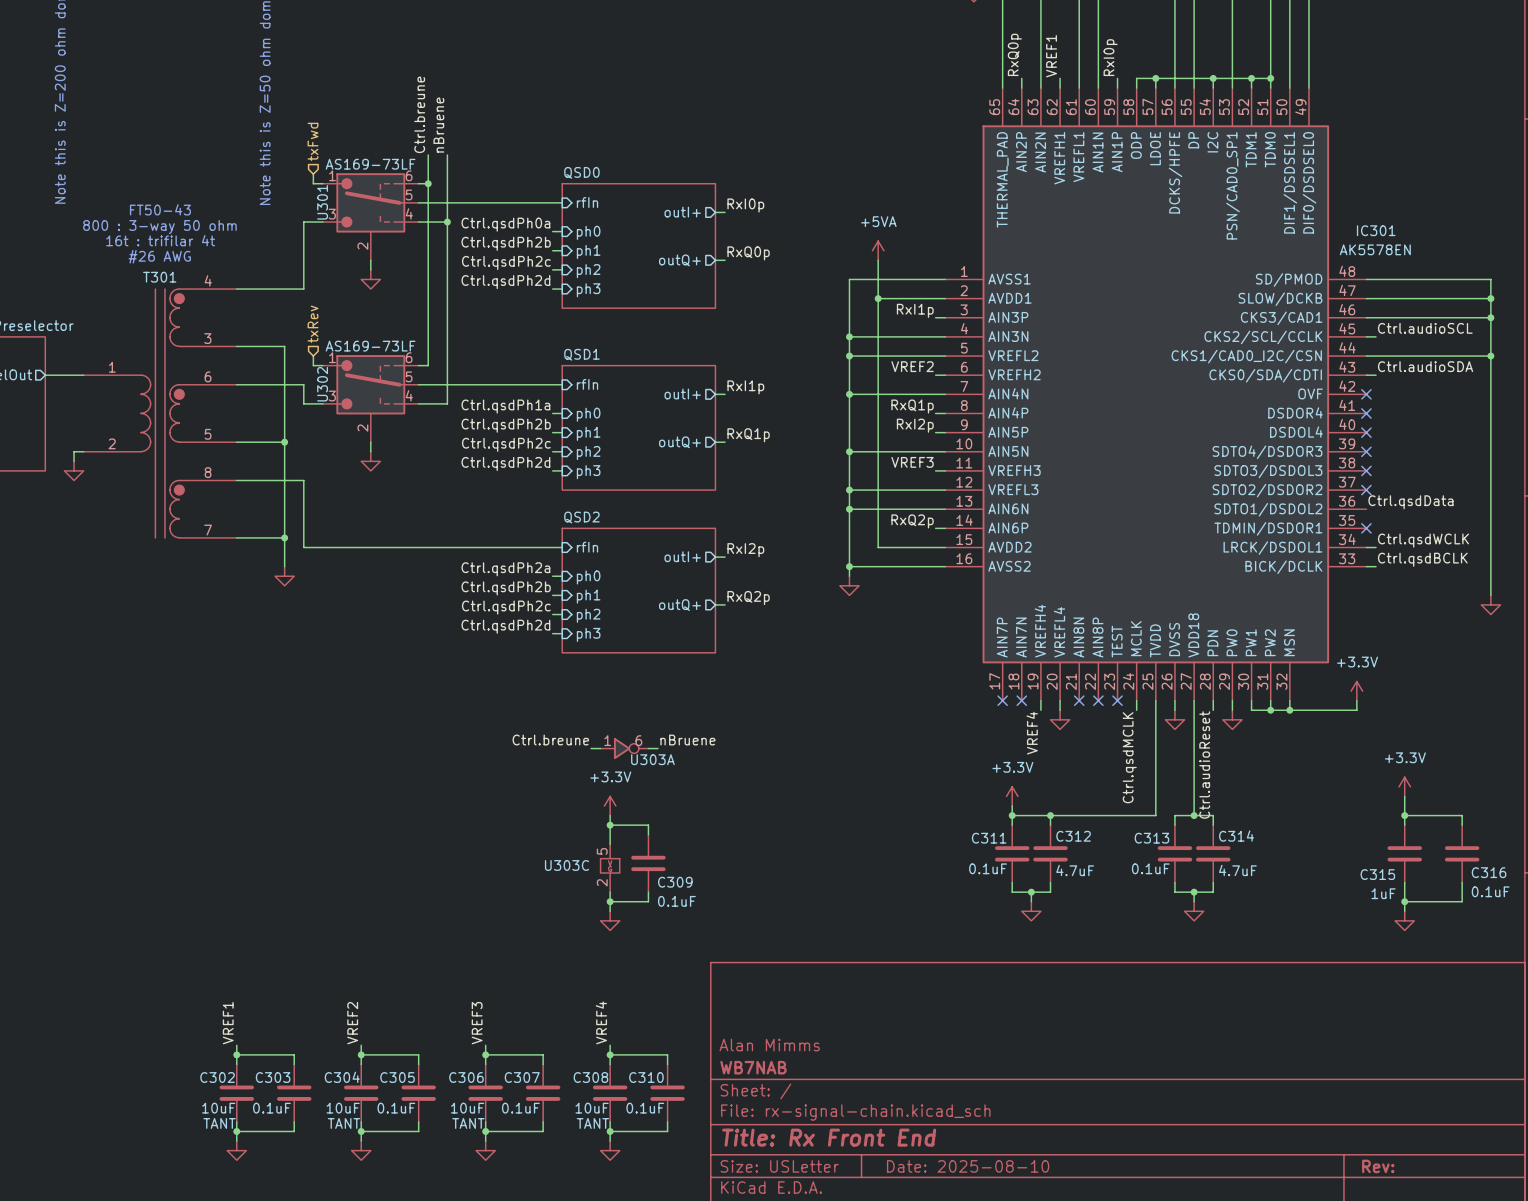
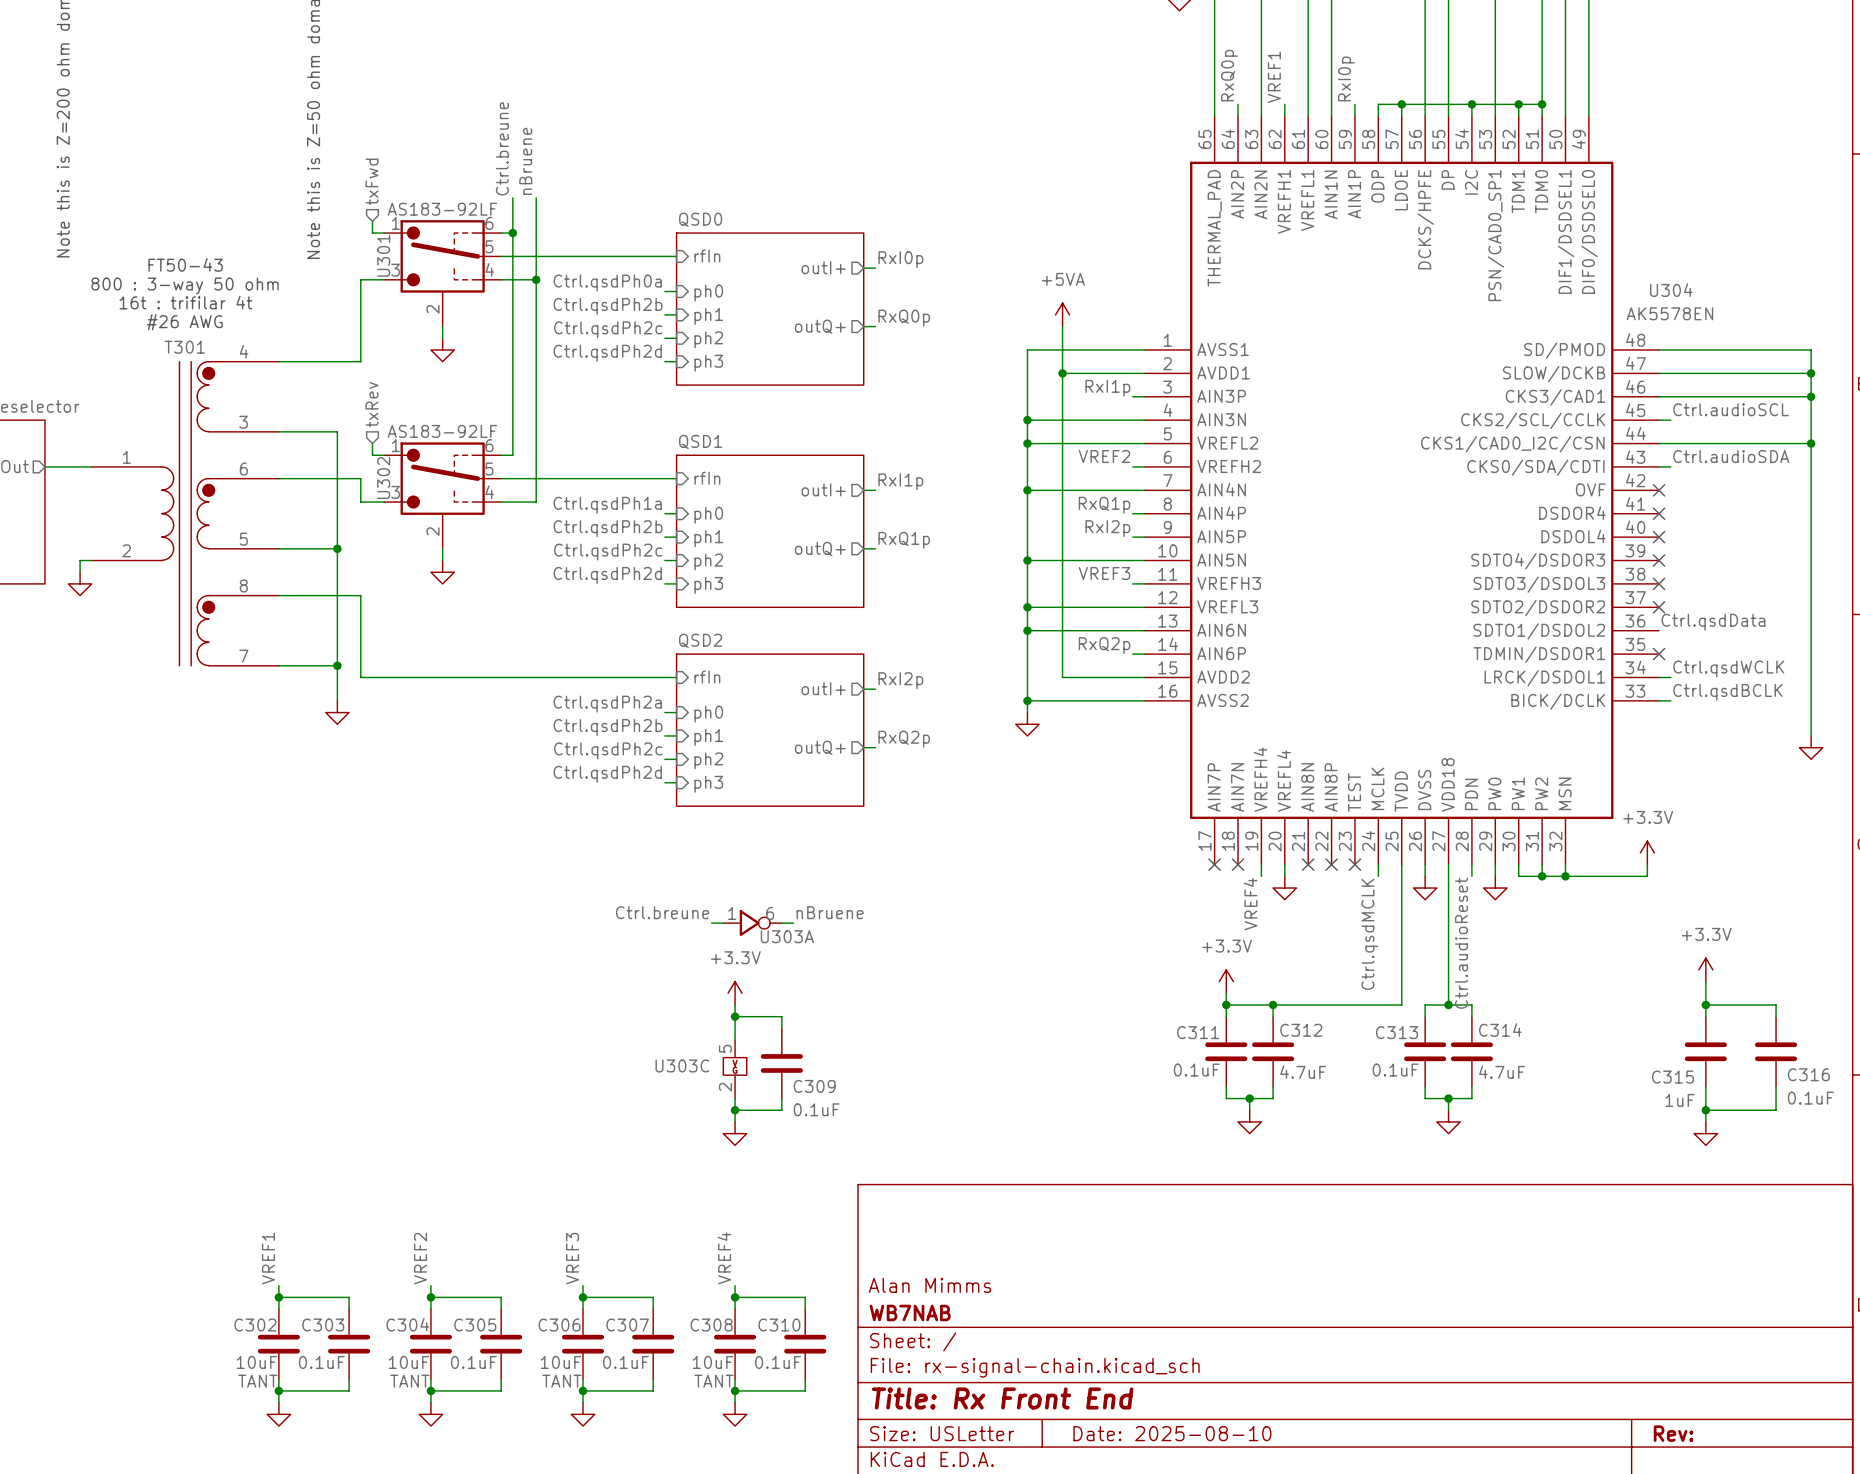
U301 value: AS169-73LF (370, 164) -> AS183-92LF (442, 209)
IC301 name: IC301 (1376, 230) -> U304 (1671, 290)
U302 value: AS169-73LF (370, 346) -> AS183-92LF (442, 431)

